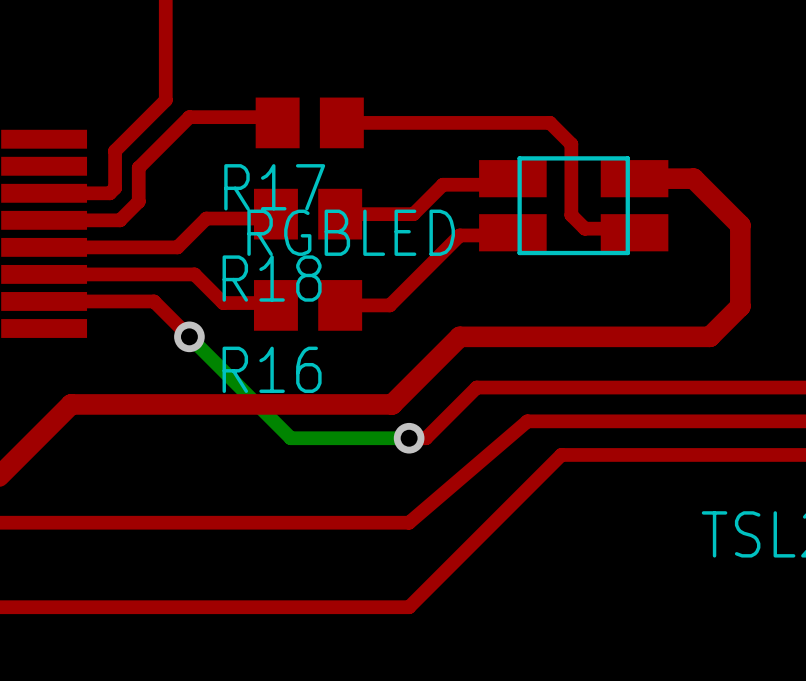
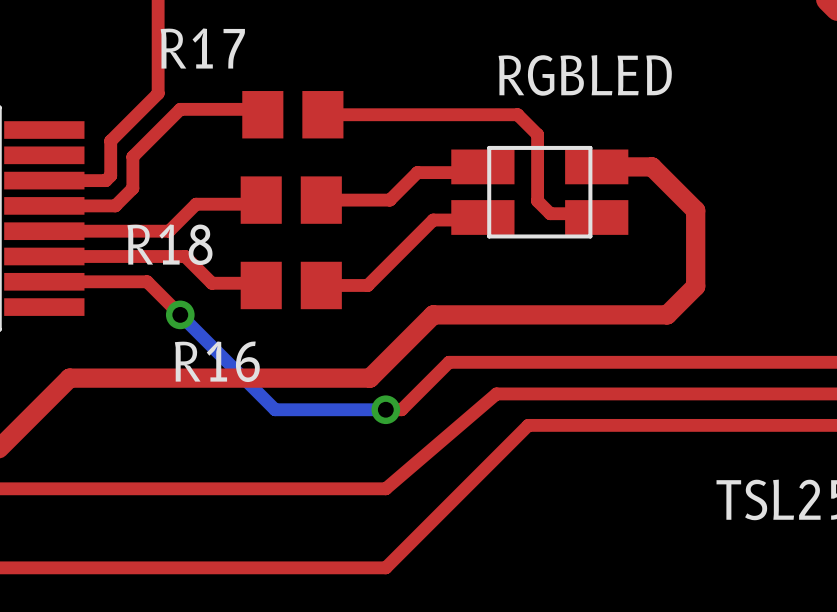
R17 name position: R17 (274, 187) -> R17 (202, 48)
part value position: RGBLED (351, 232) -> RGBLED (585, 75)
R18 name position: R18 (272, 278) -> R18 (169, 244)
R16 name position: R16 (272, 369) -> R16 (217, 361)

